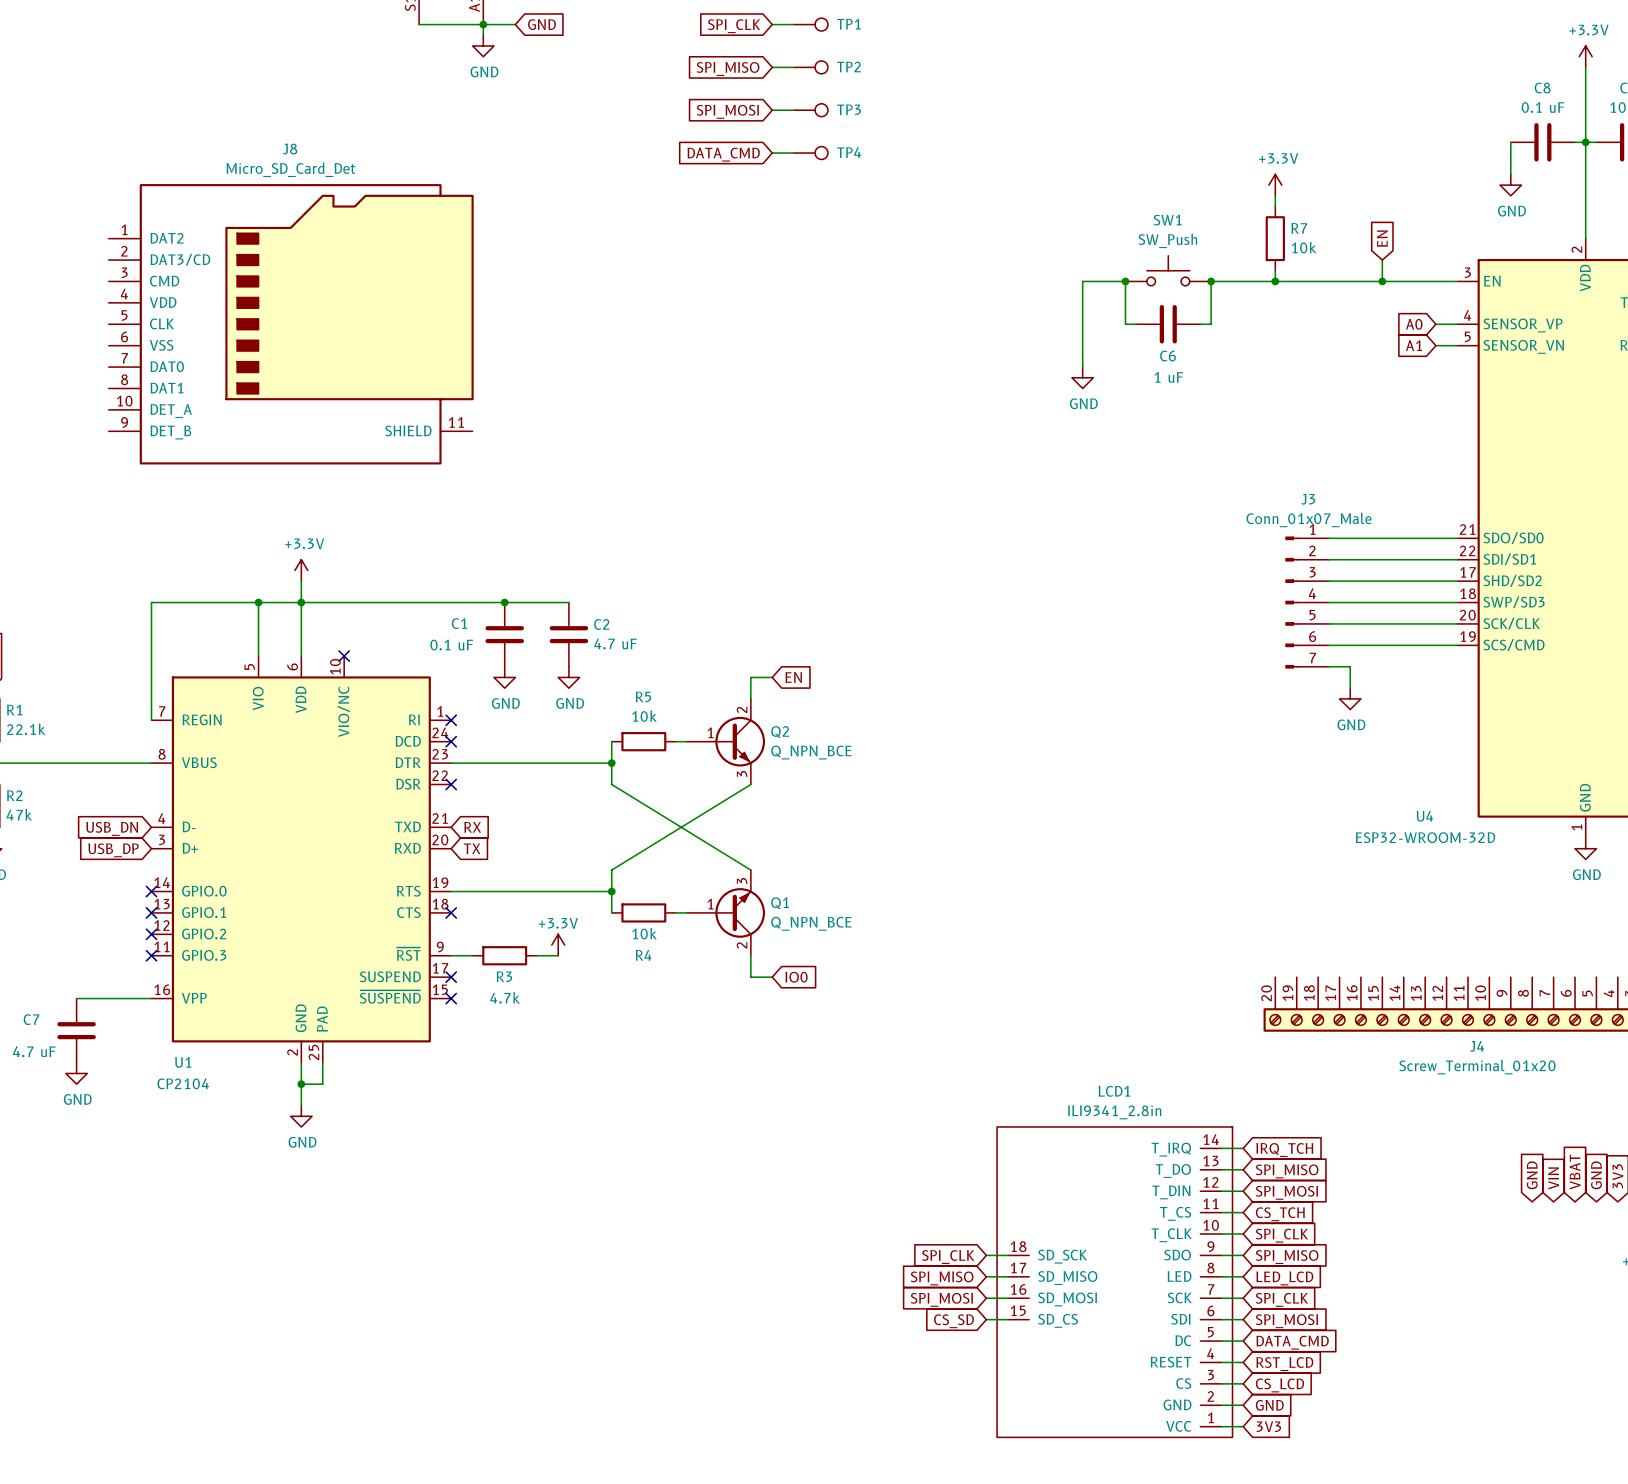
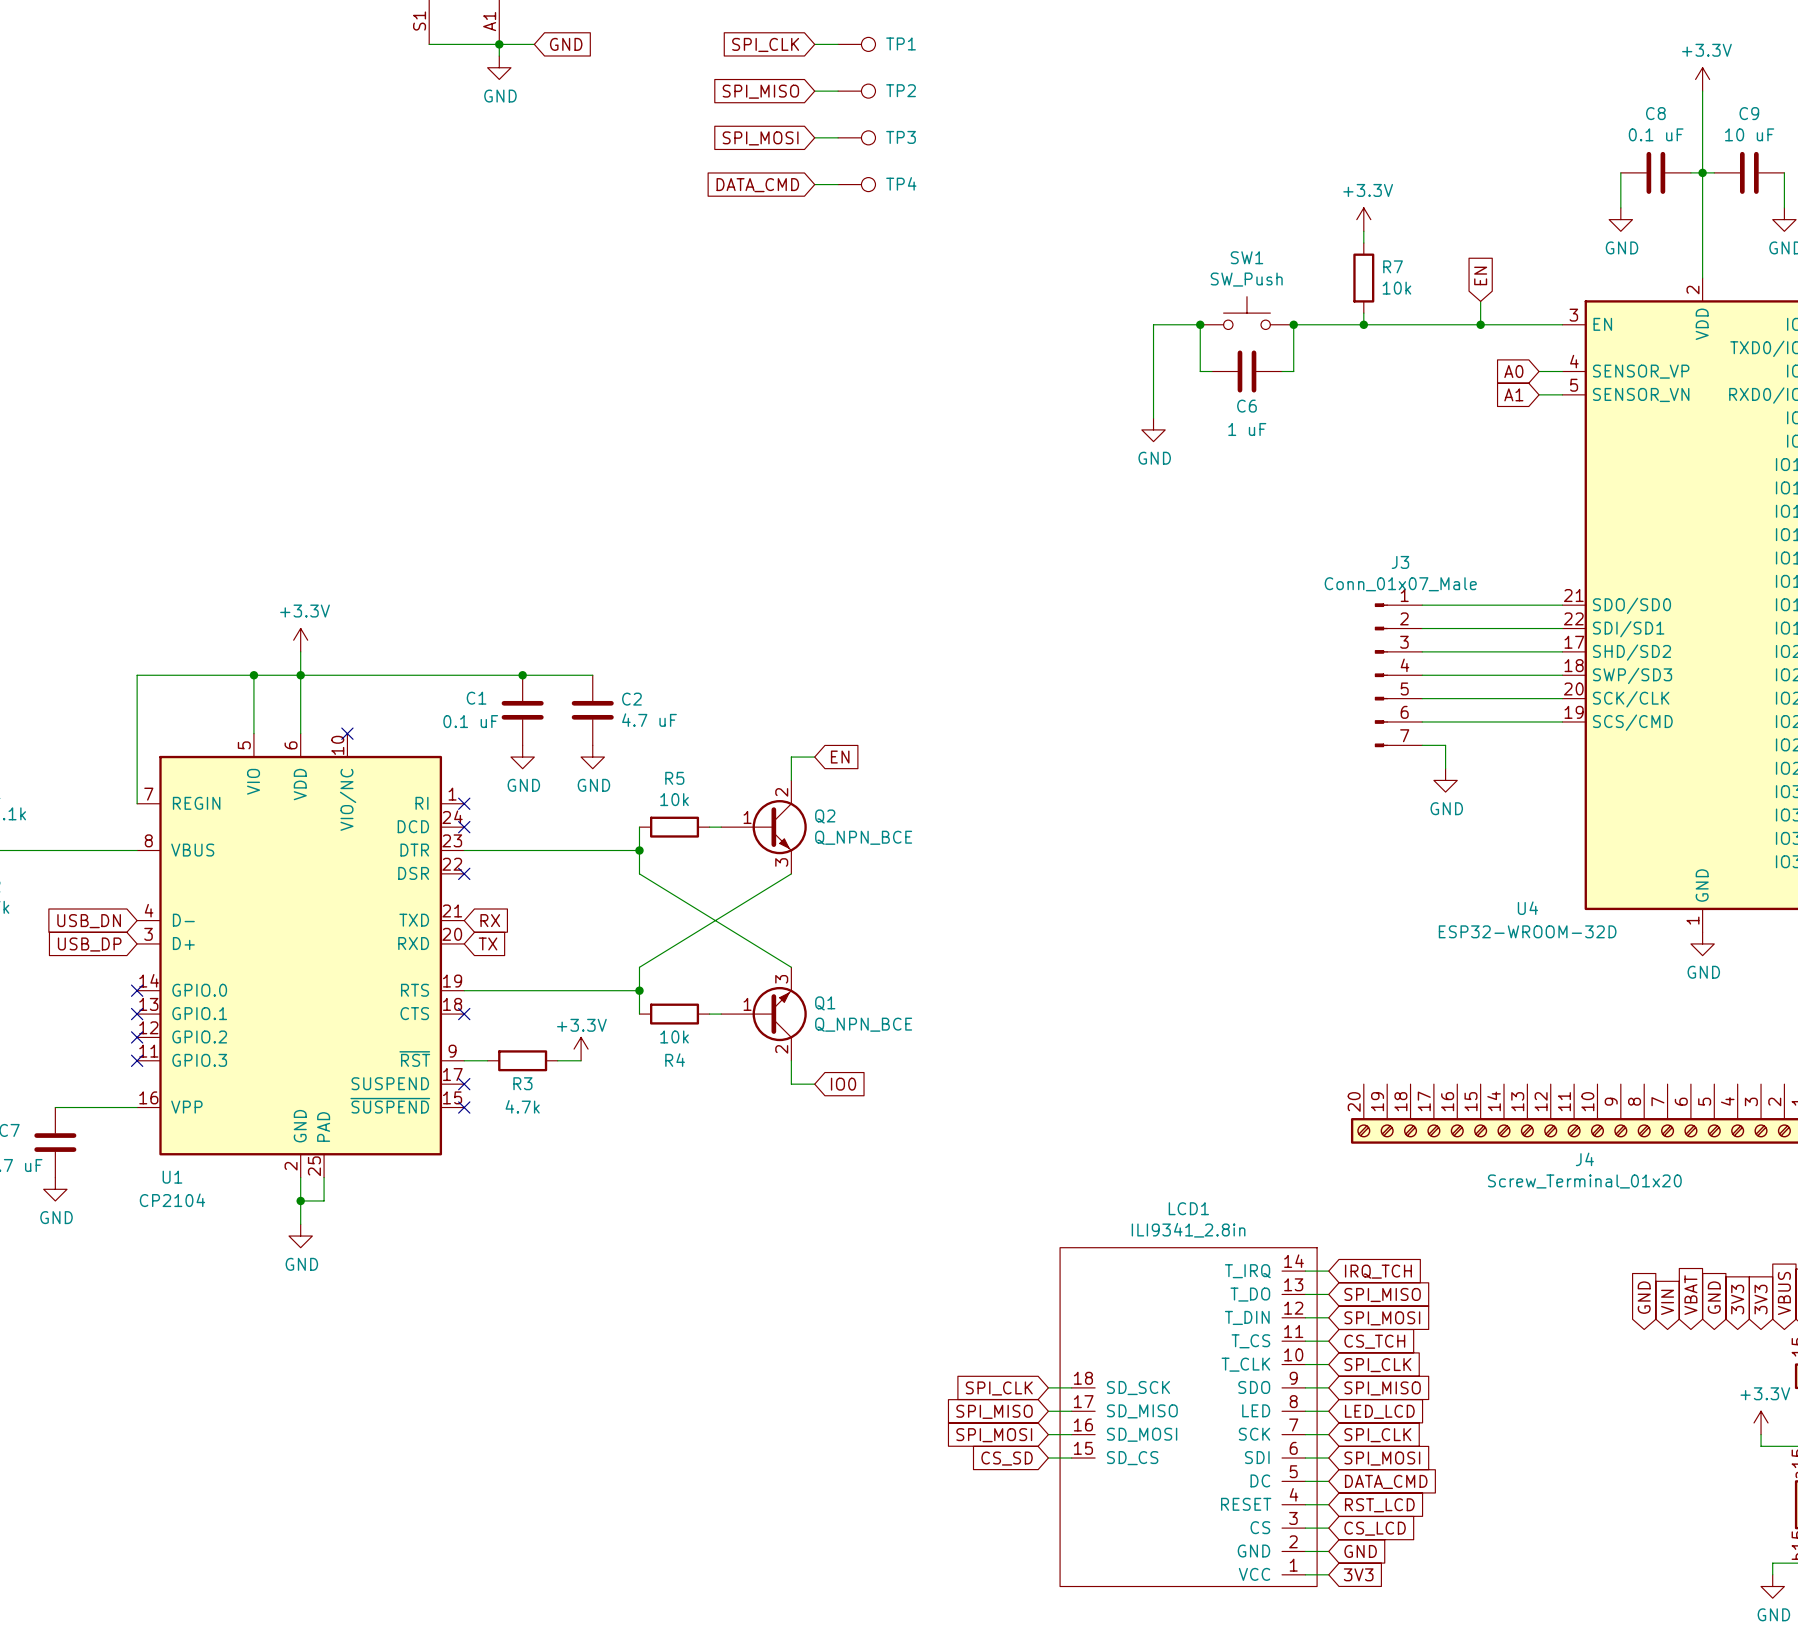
J8: Micro_SD_Card_Det (291, 324) -> none

